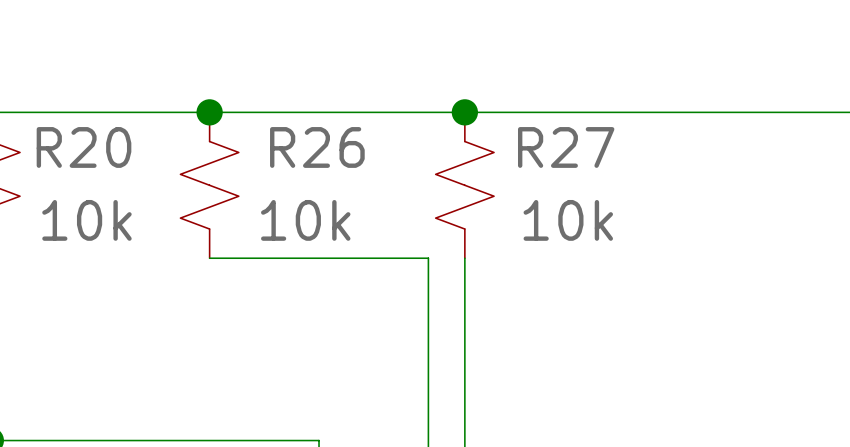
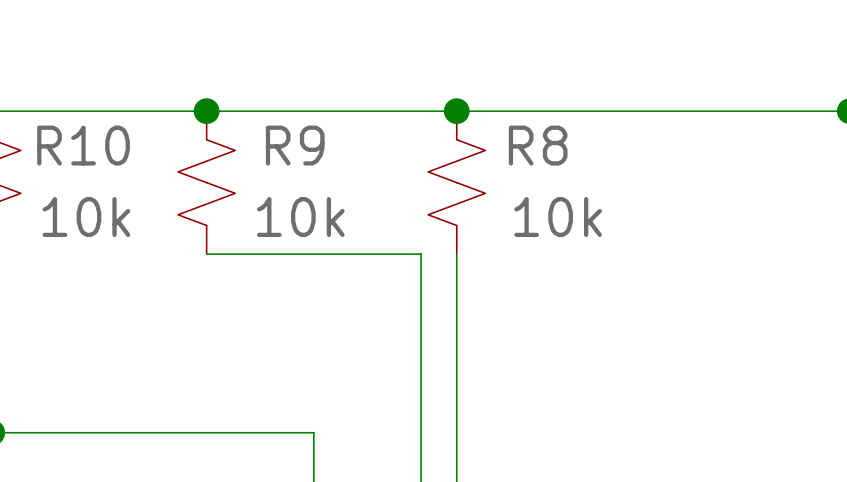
R20 name: R20 (84, 147) -> R10 (83, 145)
R26 name: R26 (317, 147) -> R9 (295, 145)
R27 name: R27 (566, 147) -> R8 (538, 145)

